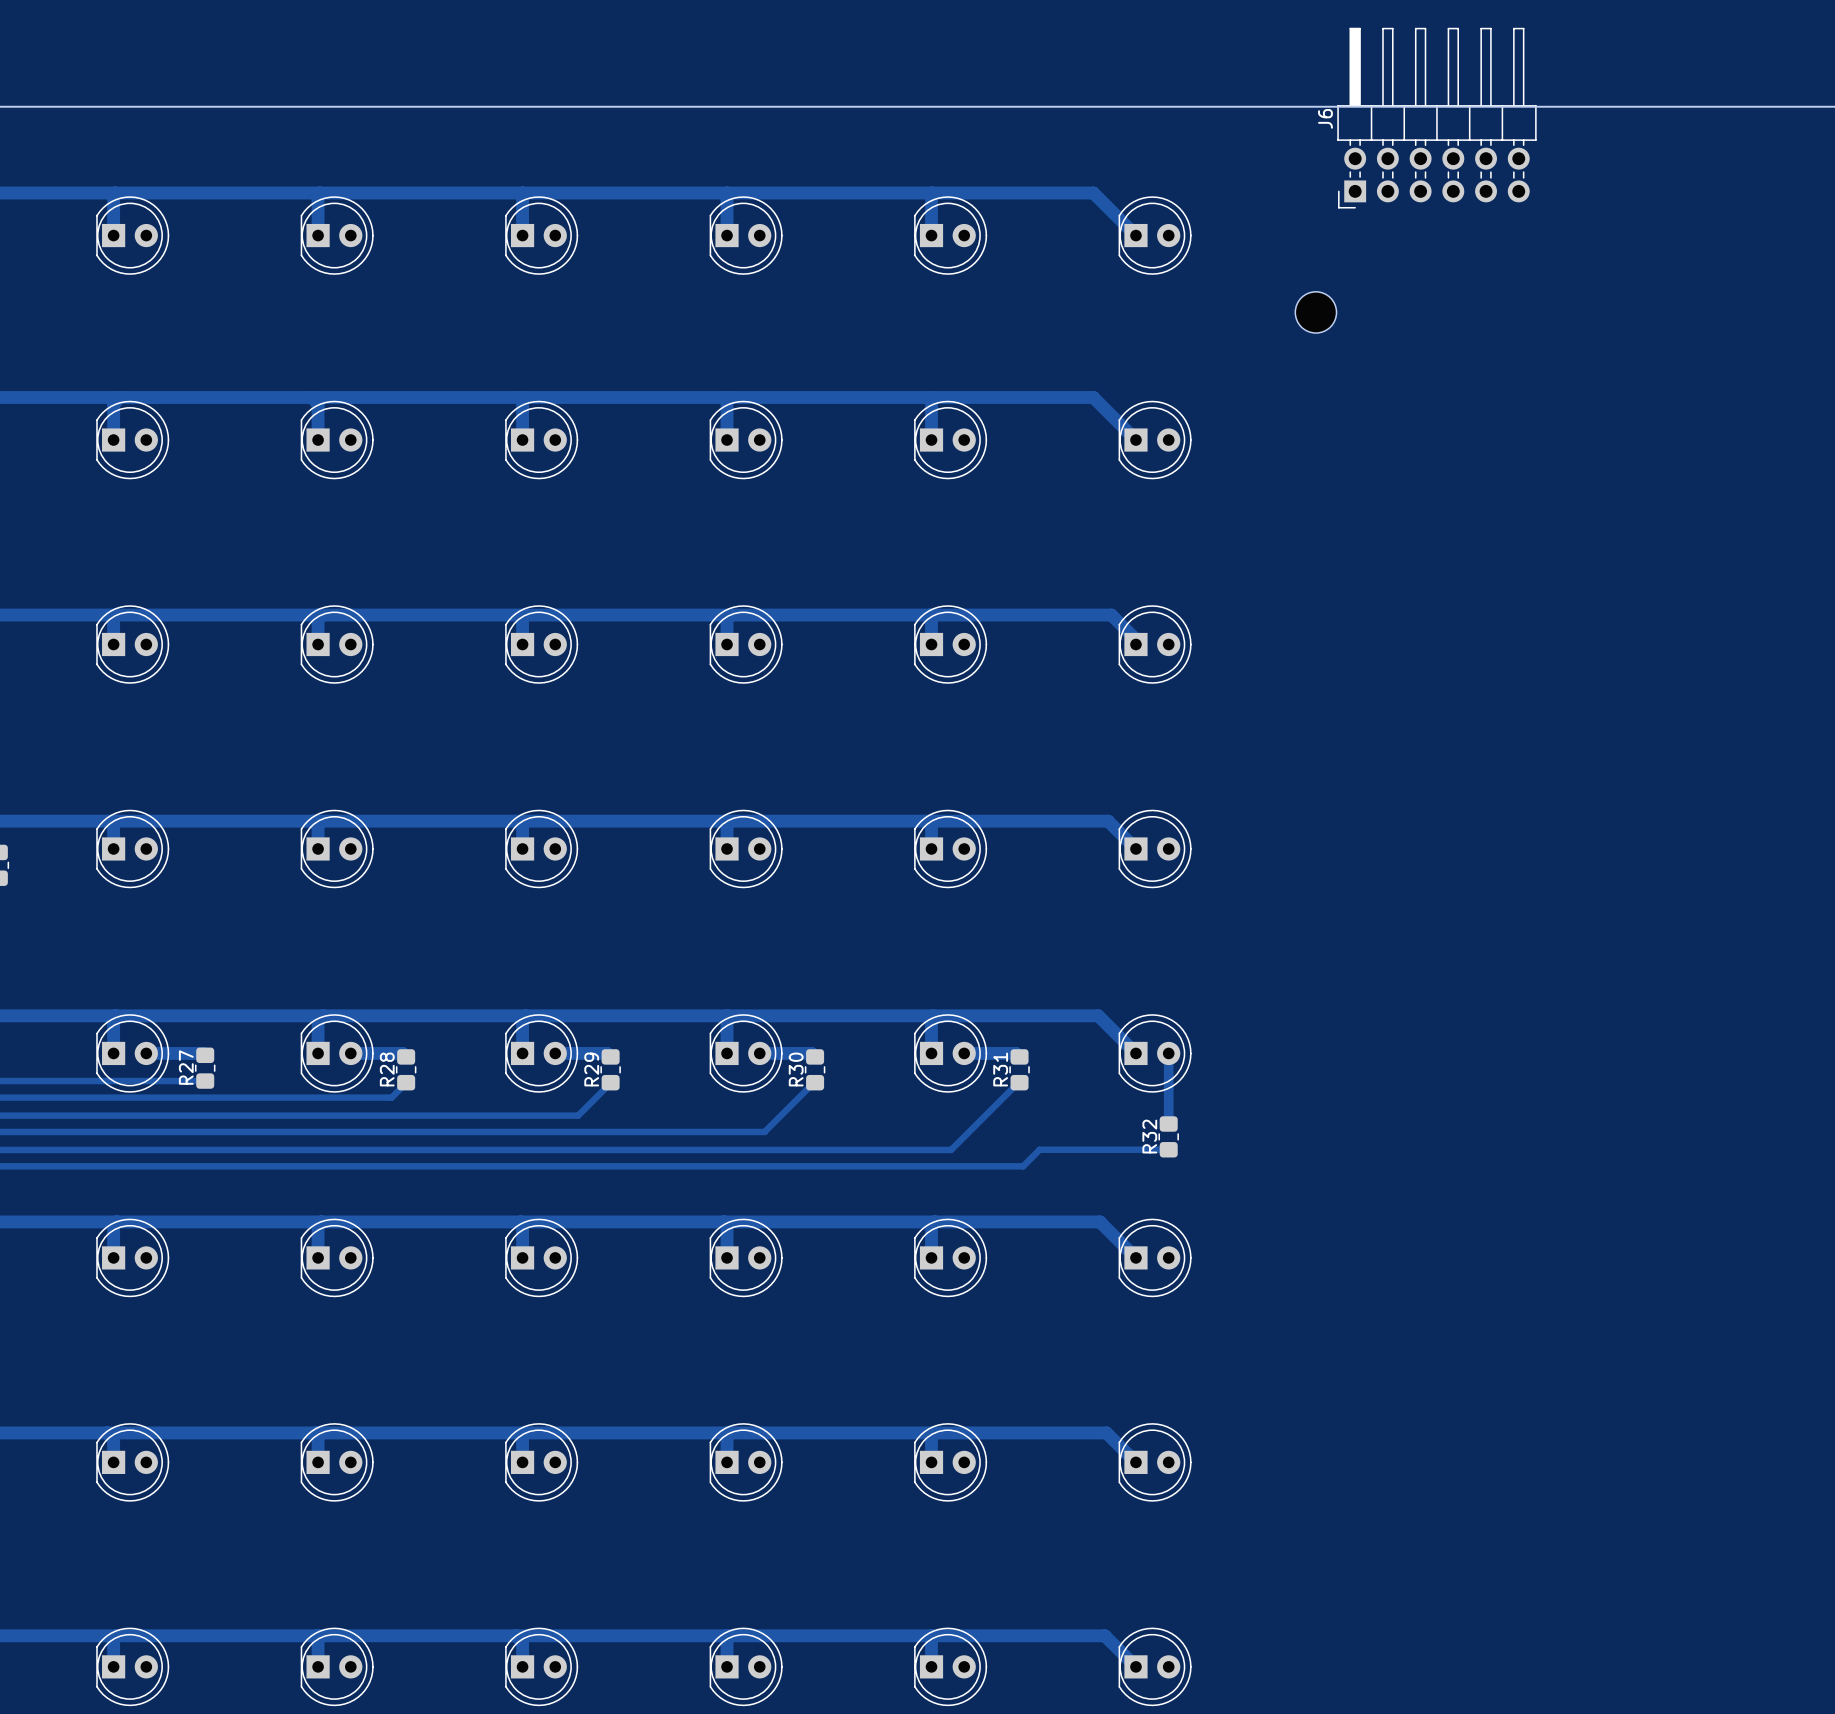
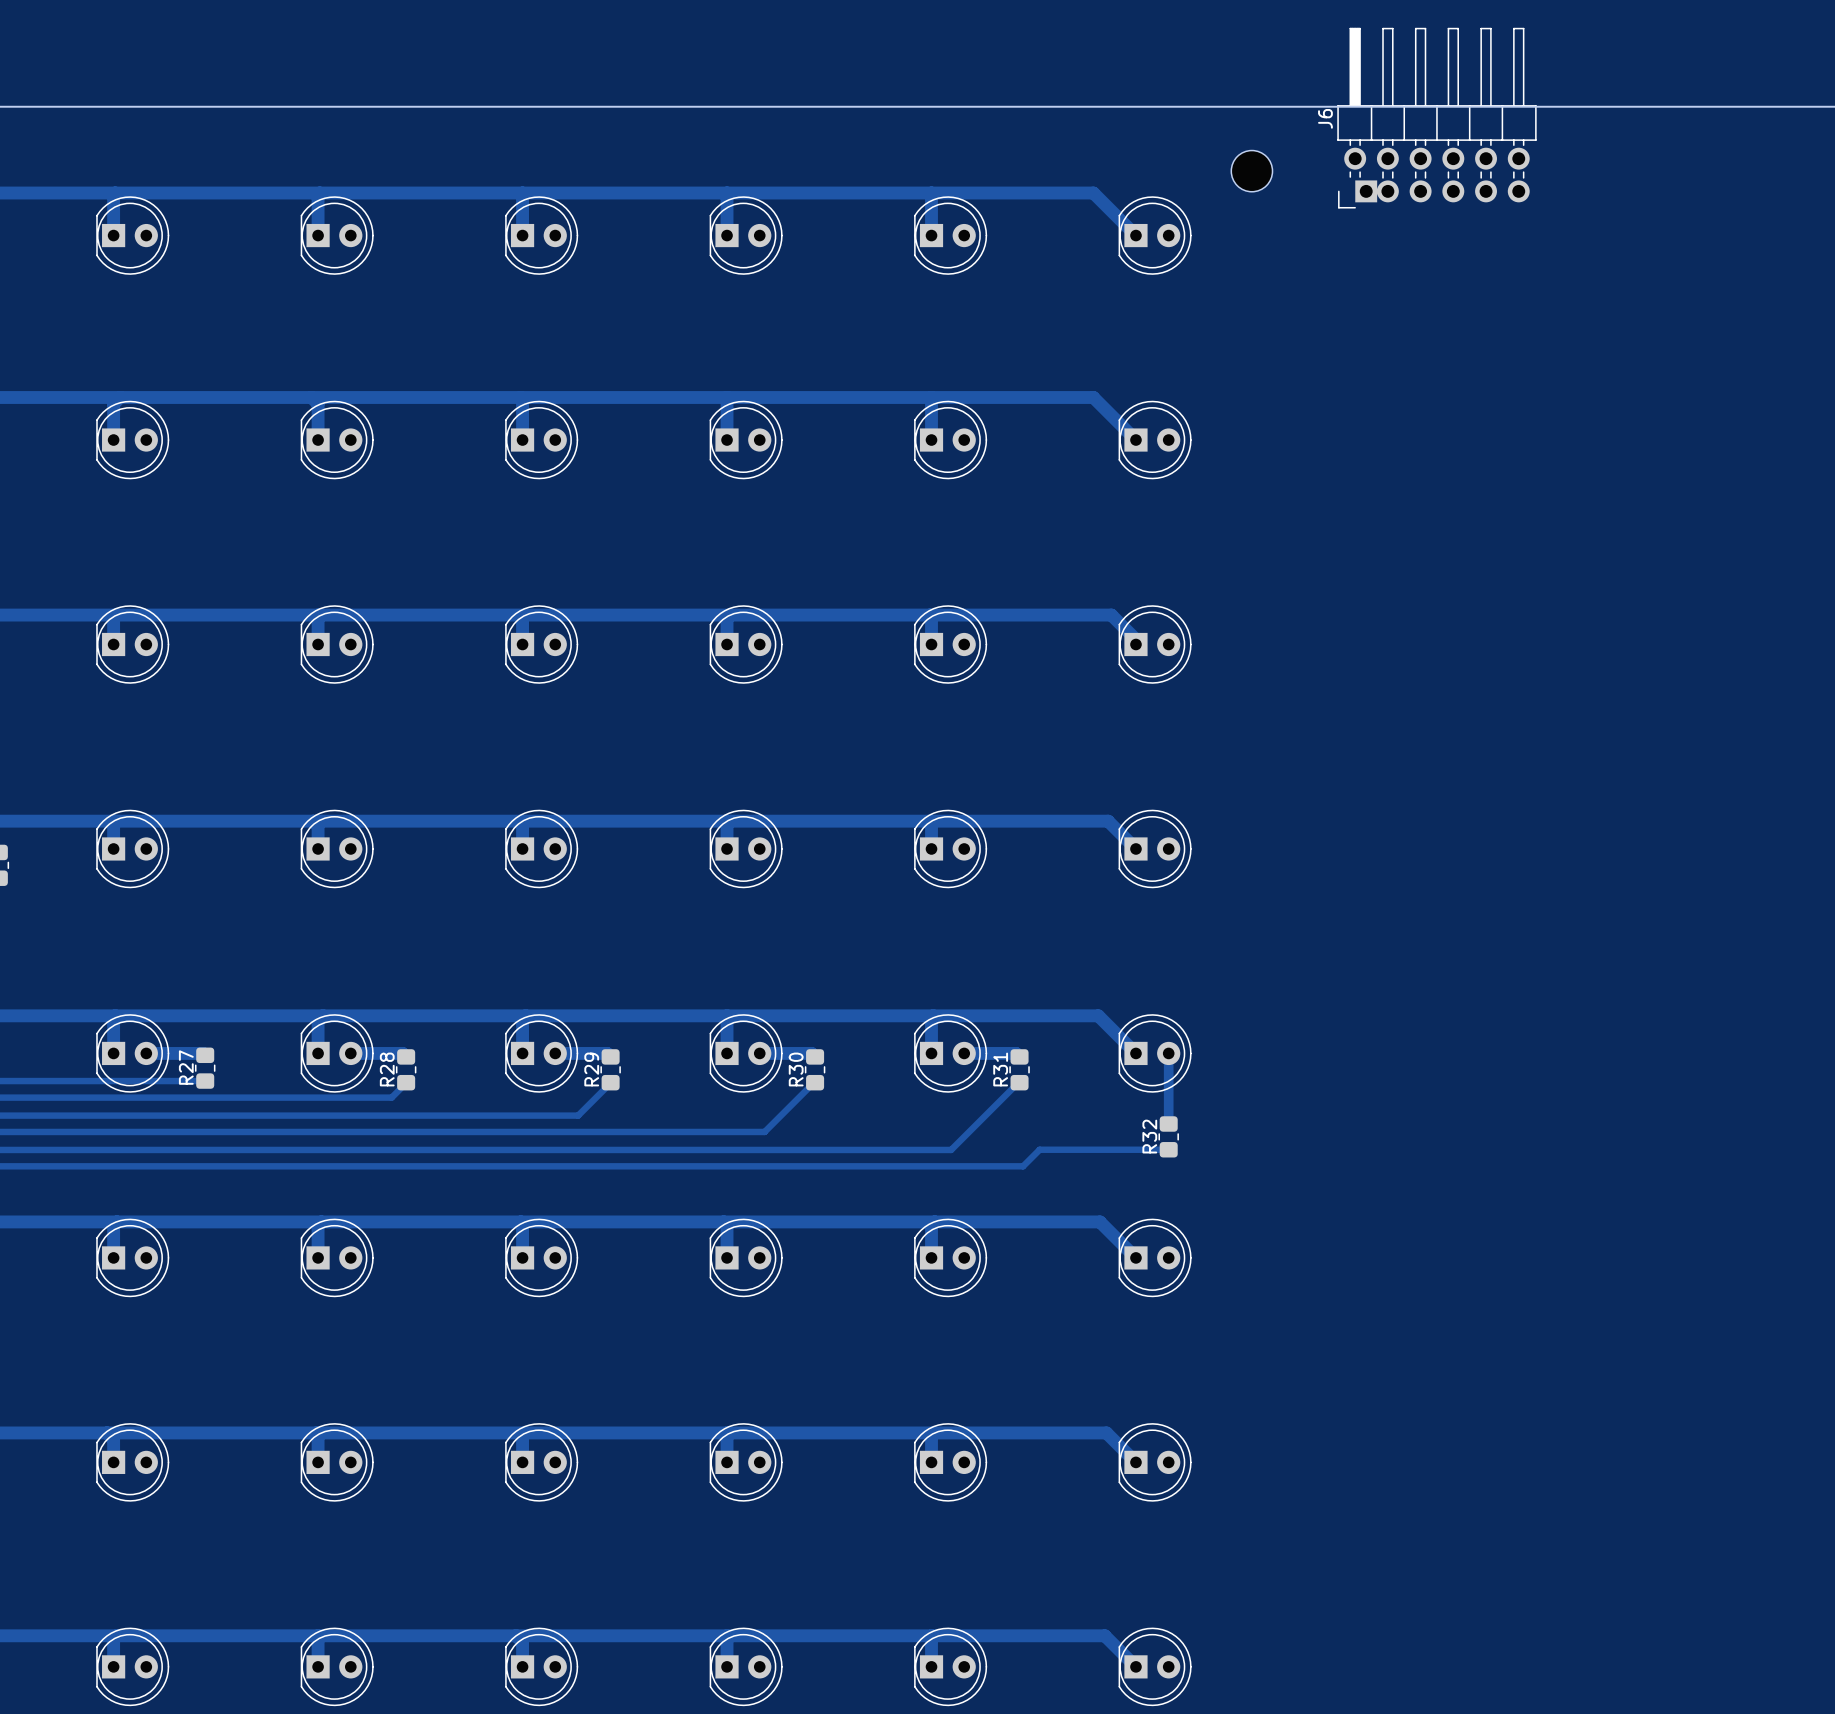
J6 footprint: [1337, 27, 1537, 209] -> [1337, 27, 1537, 209]
part position: (1315, 312) -> (1251, 171)

